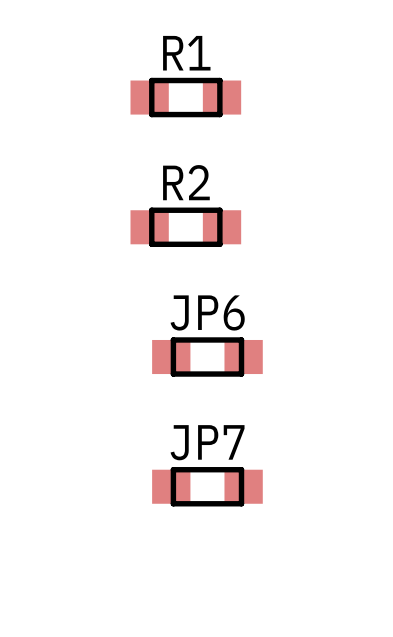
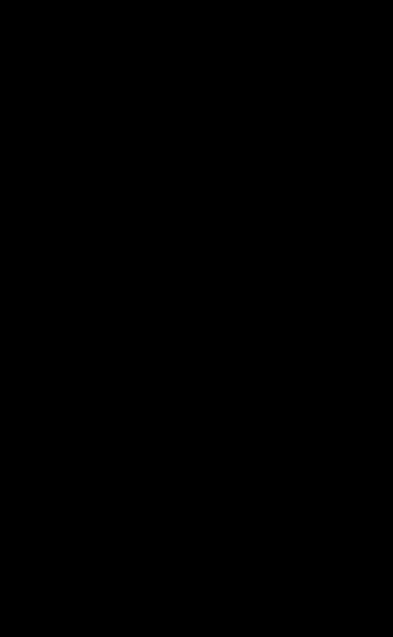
R1: (185, 97) -> none
R2: (185, 227) -> none
JP6: (207, 357) -> none
JP7: (207, 486) -> none

